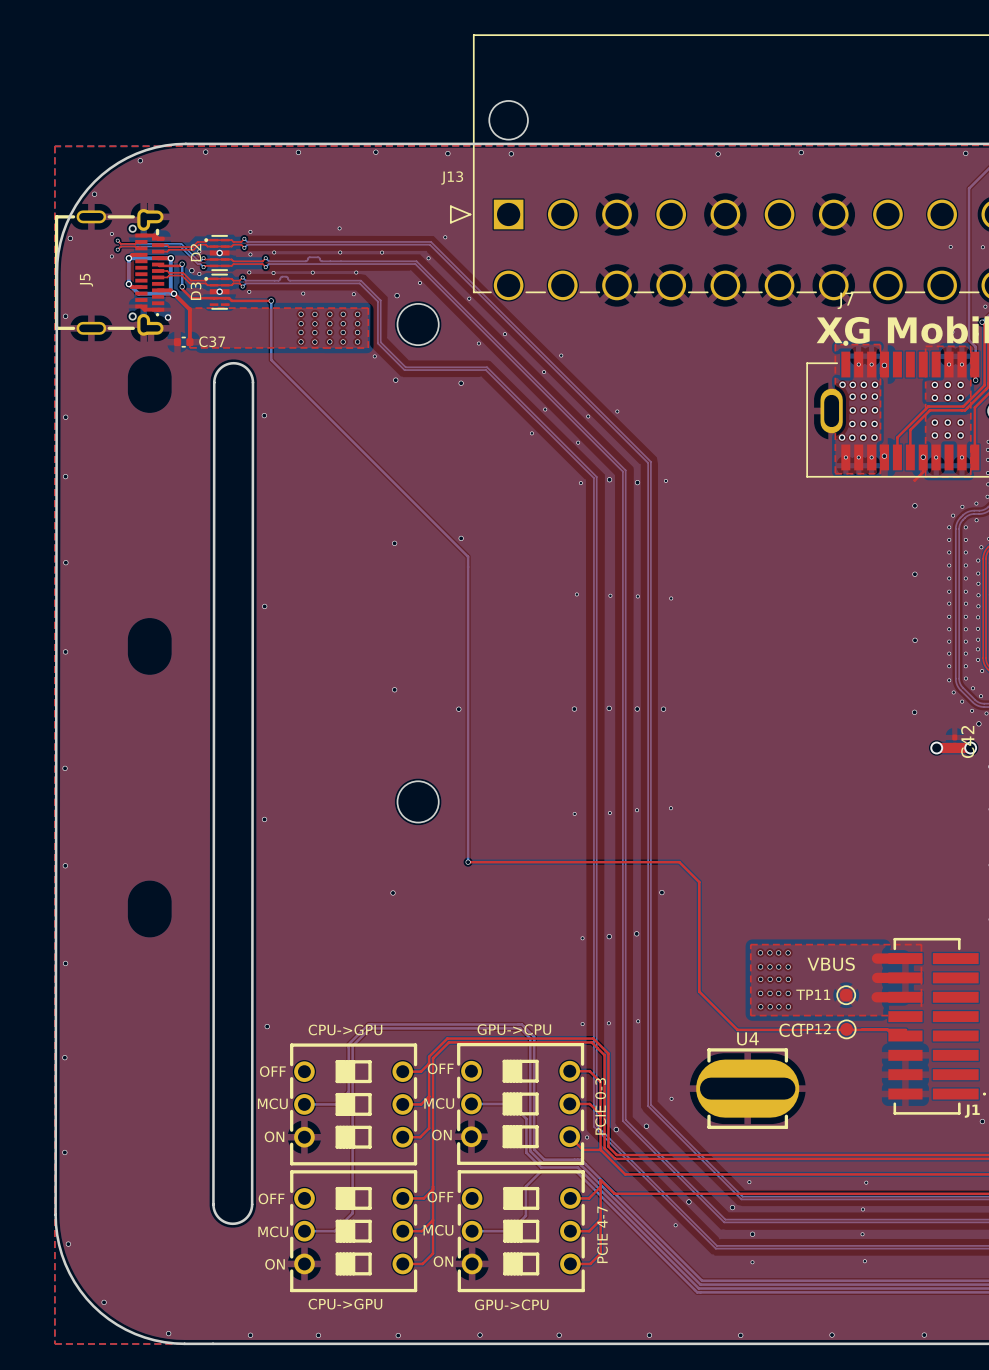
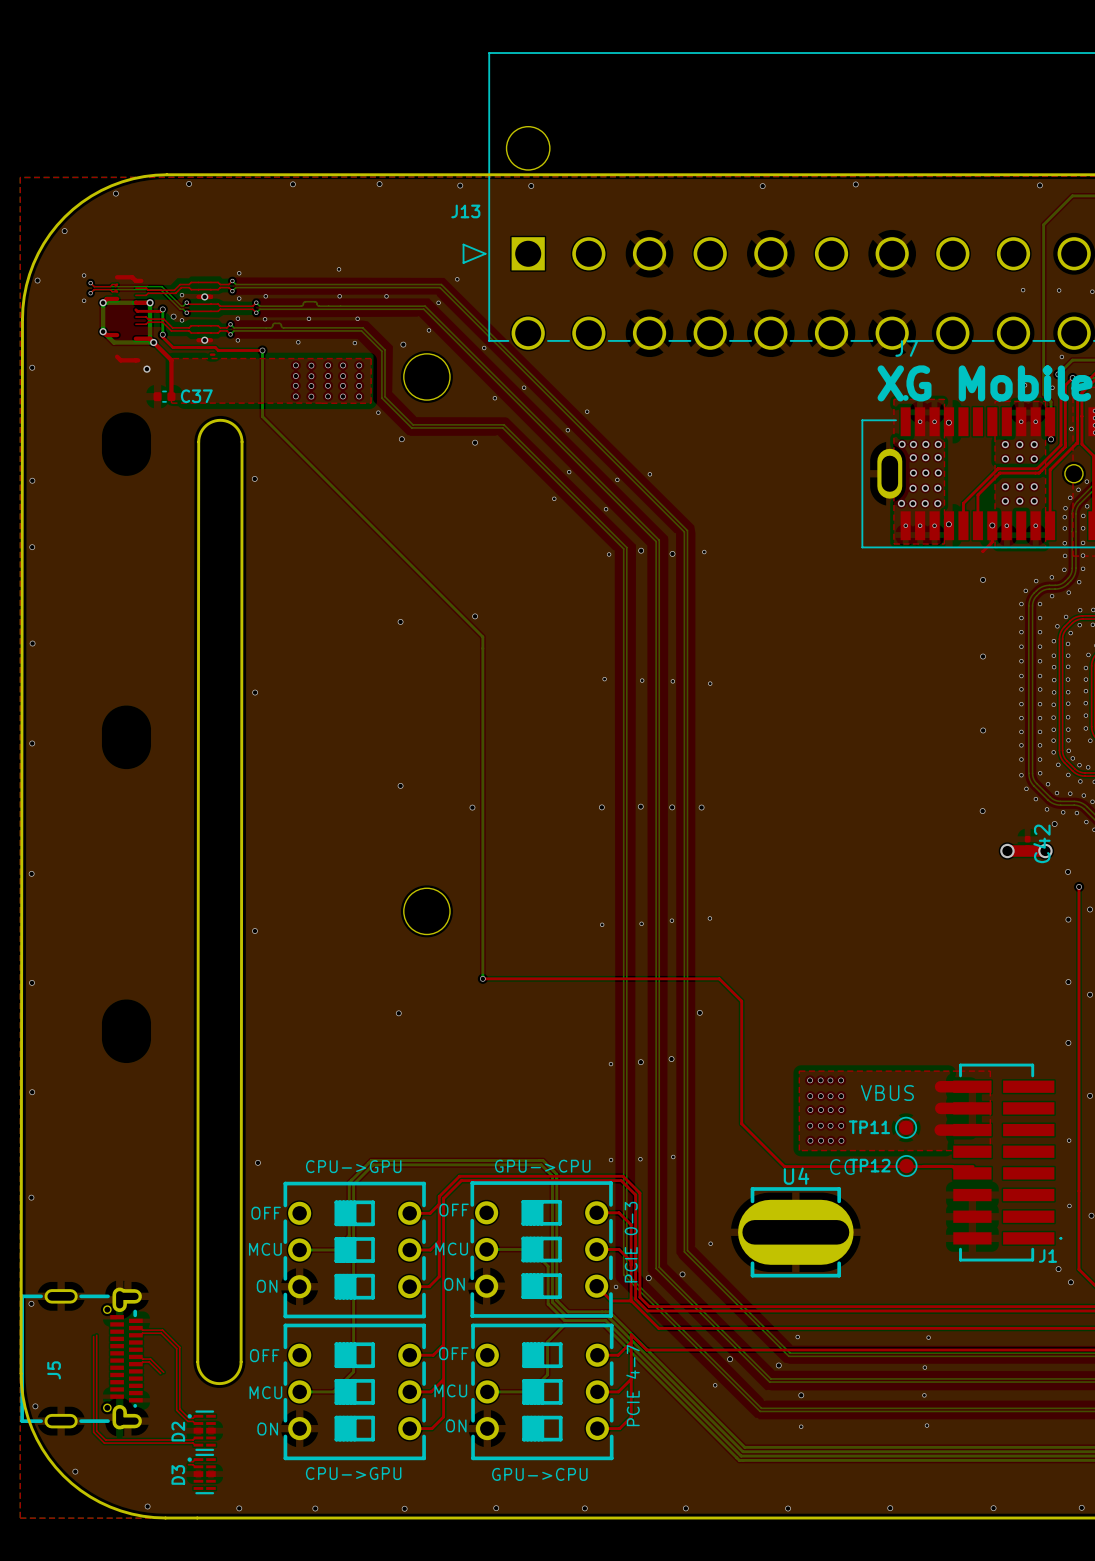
D2 position: (216, 253) -> (201, 1430)
J5 position: (109, 272) -> (81, 1358)
D3 position: (216, 291) -> (201, 1474)
top track: none -> (135, 1328) (142, 1330) (162, 1330) (179, 1347) (179, 1409) (189, 1418) (198, 1416)
top track: none -> (96, 1335) (96, 1431) (105, 1440) (193, 1440) (198, 1437)
top track: none -> (135, 1335) (142, 1333) (161, 1333) (176, 1348) (176, 1410) (187, 1421) (198, 1423)
top track: none -> (93, 1336) (93, 1432) (104, 1443) (193, 1443) (198, 1445)
top track: none -> (135, 1356) (150, 1359) (163, 1372)
top track: none -> (135, 1364) (149, 1362) (160, 1373)
top track: none -> (198, 1459) (189, 1461)
top track: none -> (188, 1464) (198, 1466)

